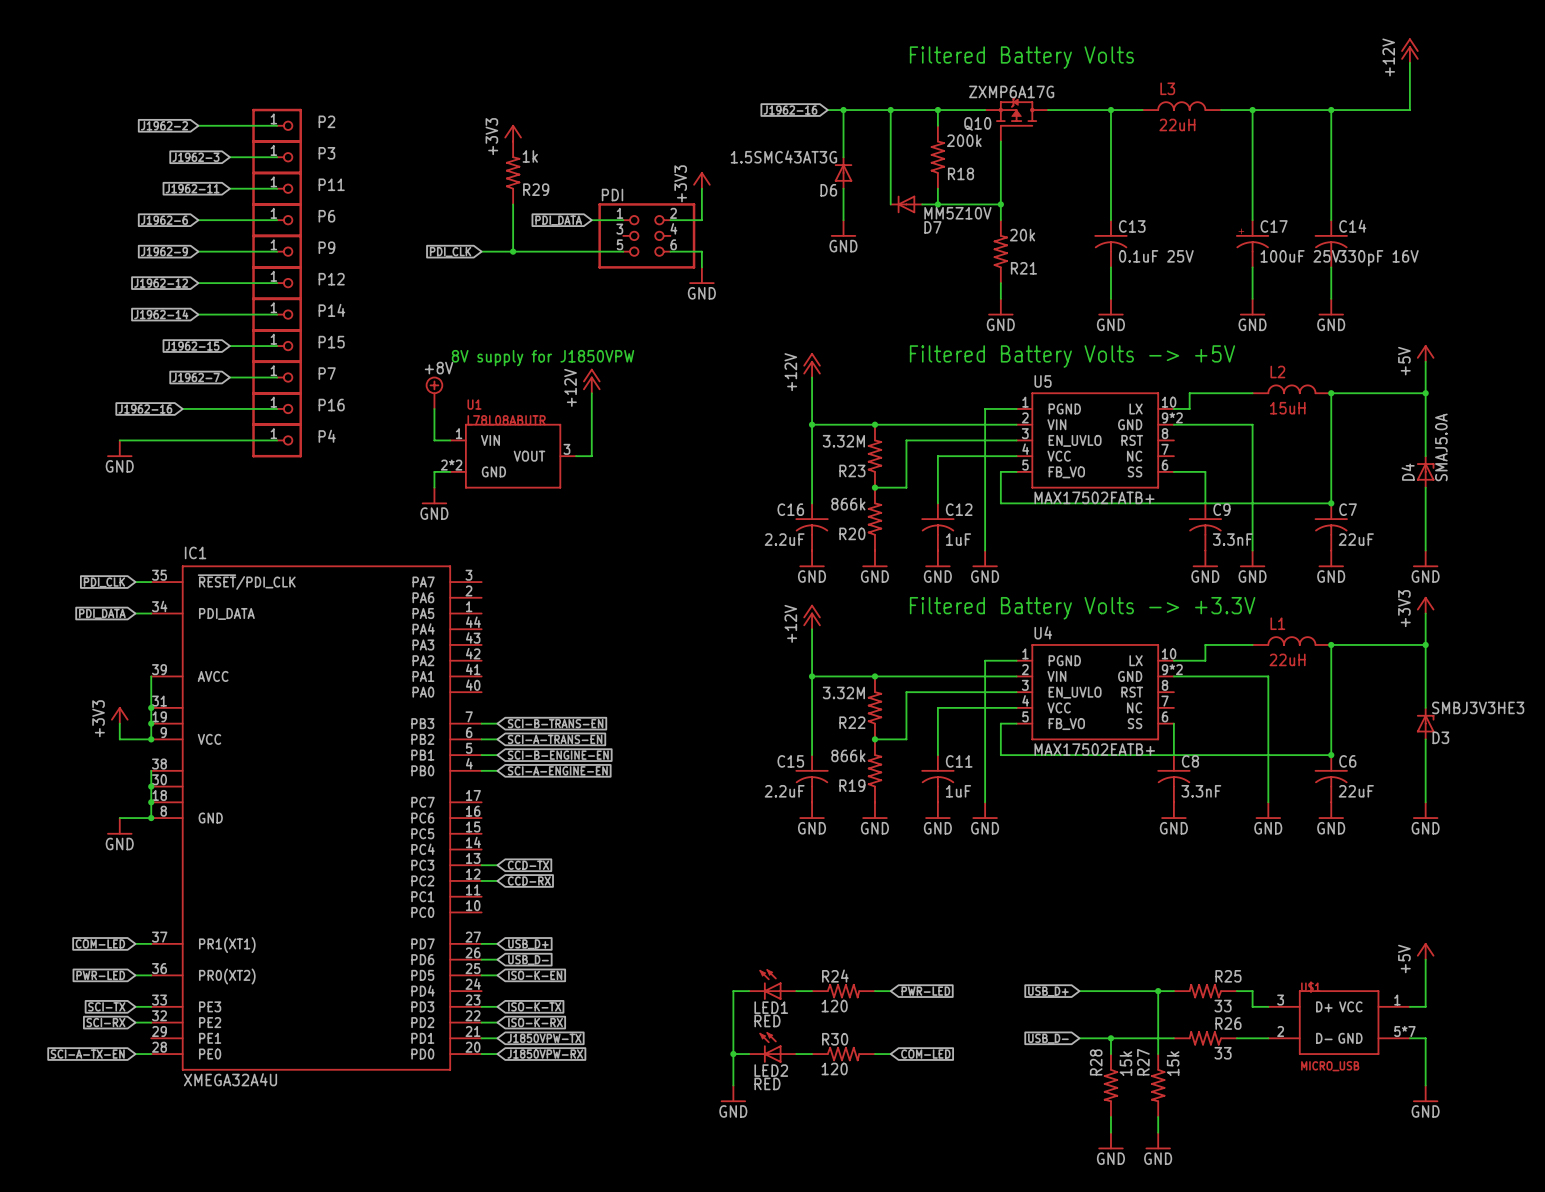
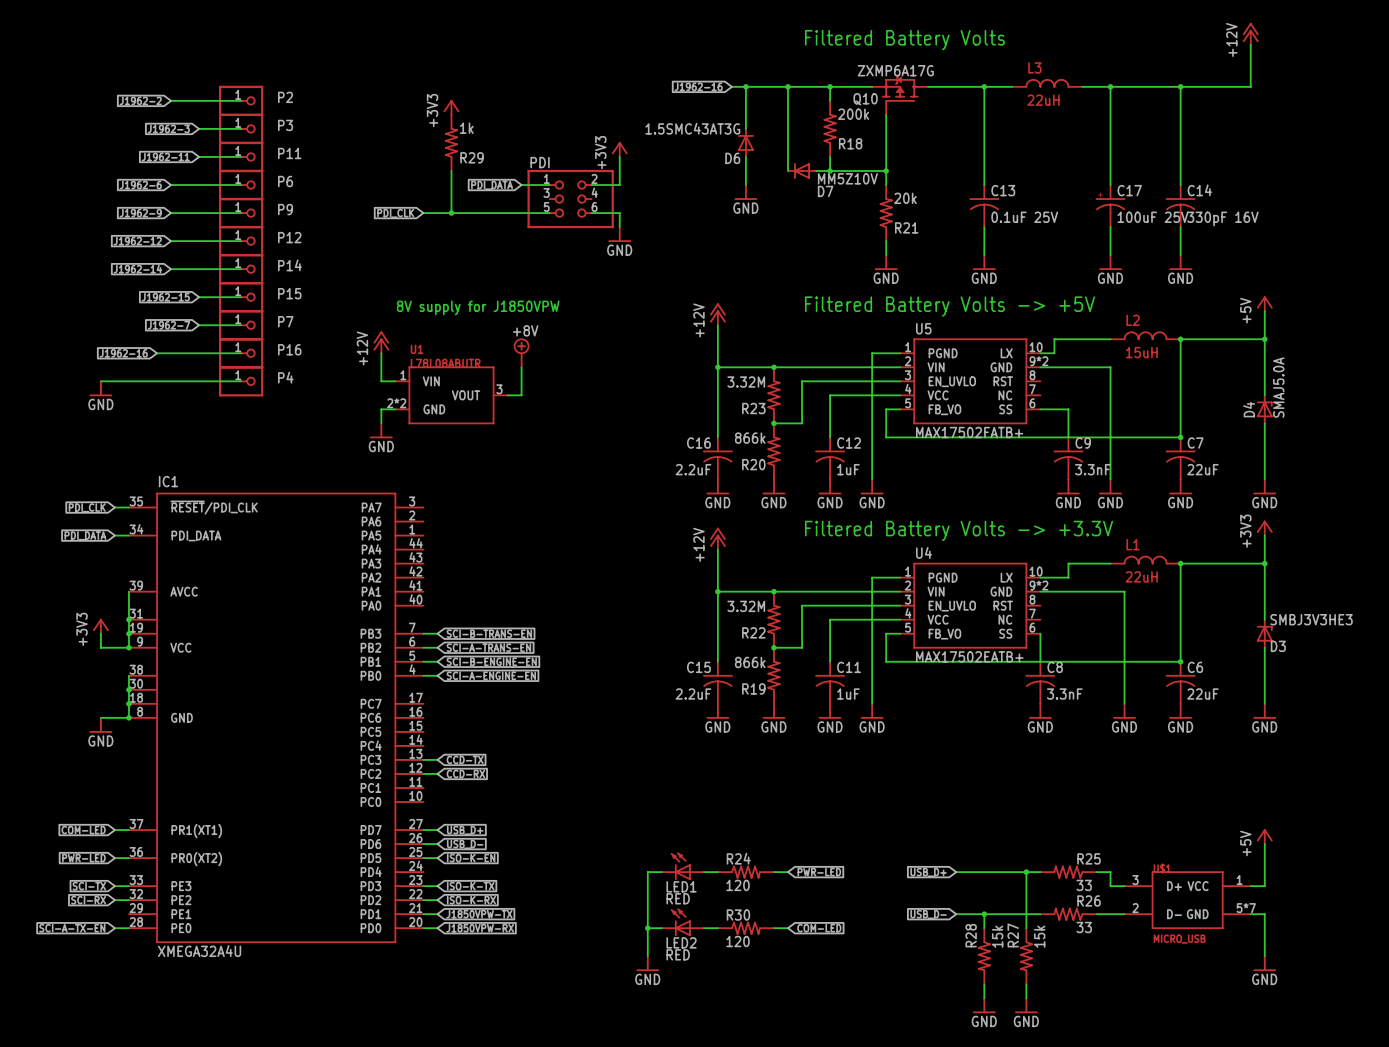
power symbol: +12V (591, 381) -> none
power symbol: +8V (434, 392) -> +12V (381, 342)
power symbol: none -> +8V (521, 352)

